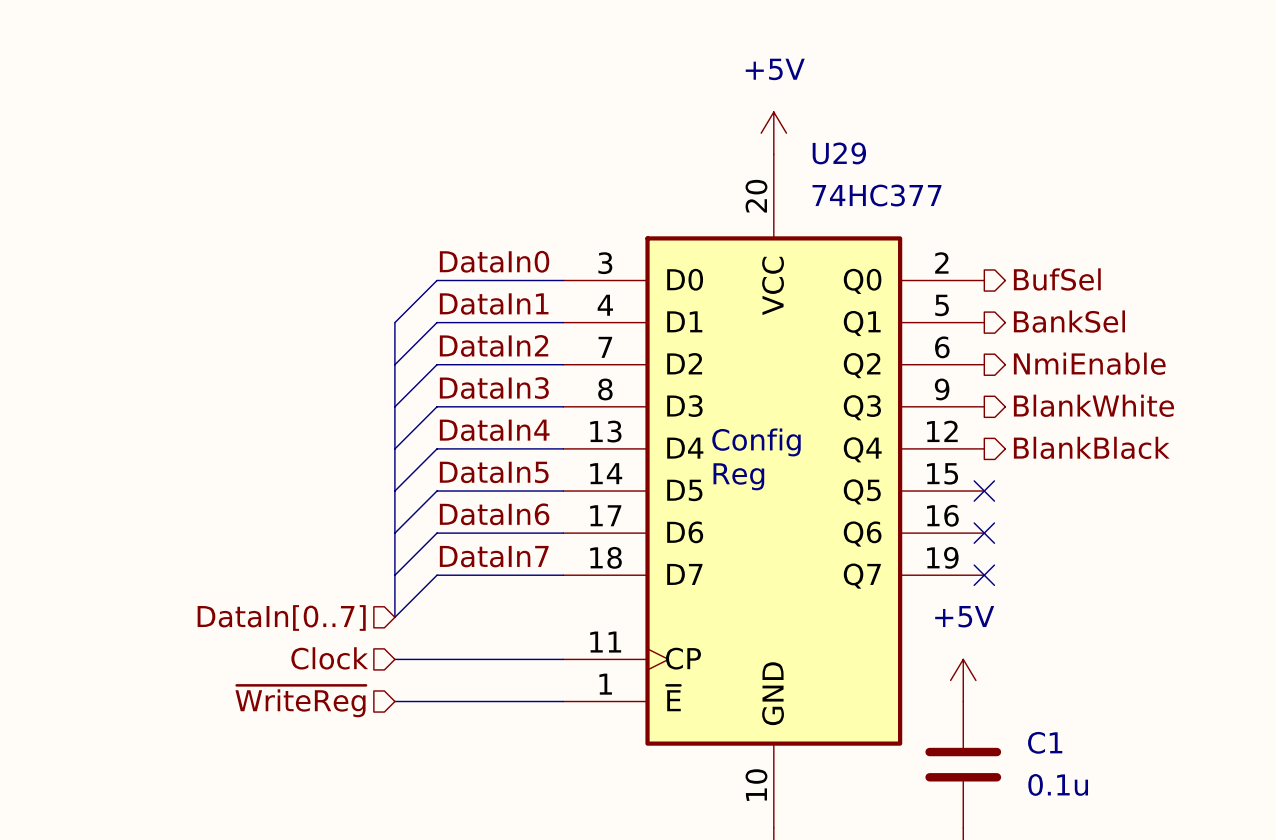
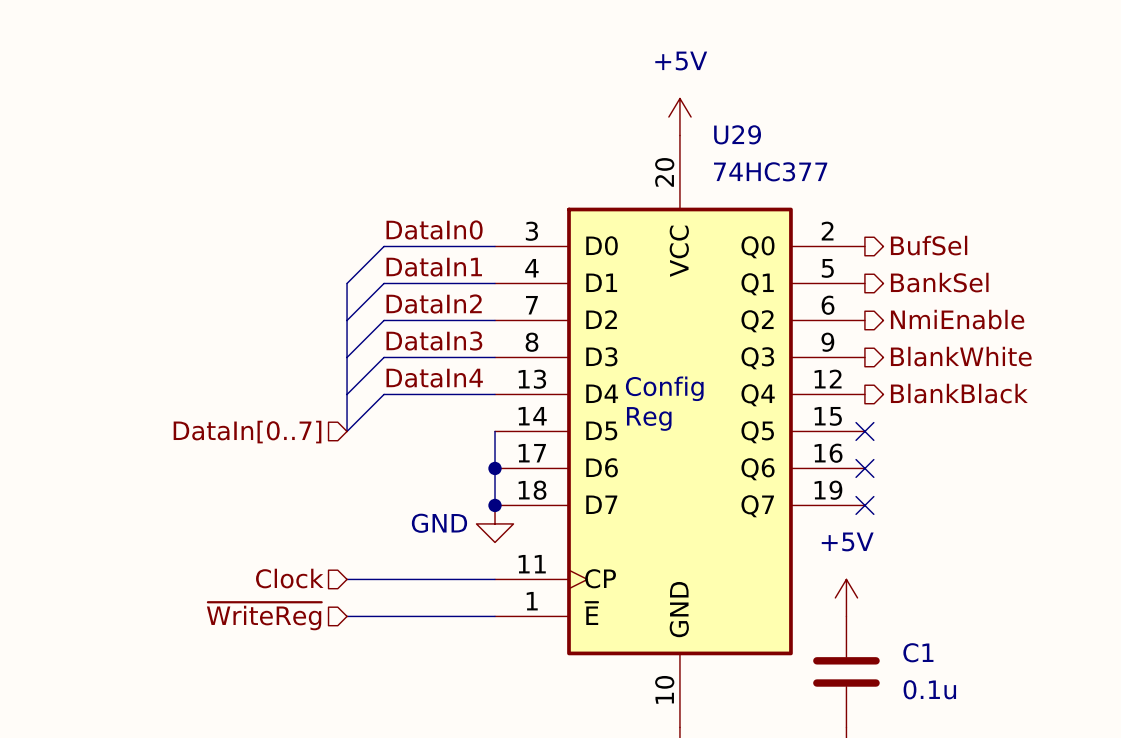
label: DataIn5 (494, 472) -> none
bus: (394, 491) (394, 617) -> none
wire: (563, 491) (437, 491) (394, 533) -> (495, 431) (495, 505)
label: DataIn6 (494, 514) -> none
wire: (563, 533) (437, 533) (394, 575) -> none
junction: none -> (495, 468)
label: DataIn7 (494, 556) -> none
wire: (563, 575) (437, 575) (394, 617) -> none
junction: none -> (495, 505)
power symbol: none -> GND (495, 523)
hierarchical label position: DataIn[0..7] (281, 617) -> DataIn[0..7] (247, 432)

